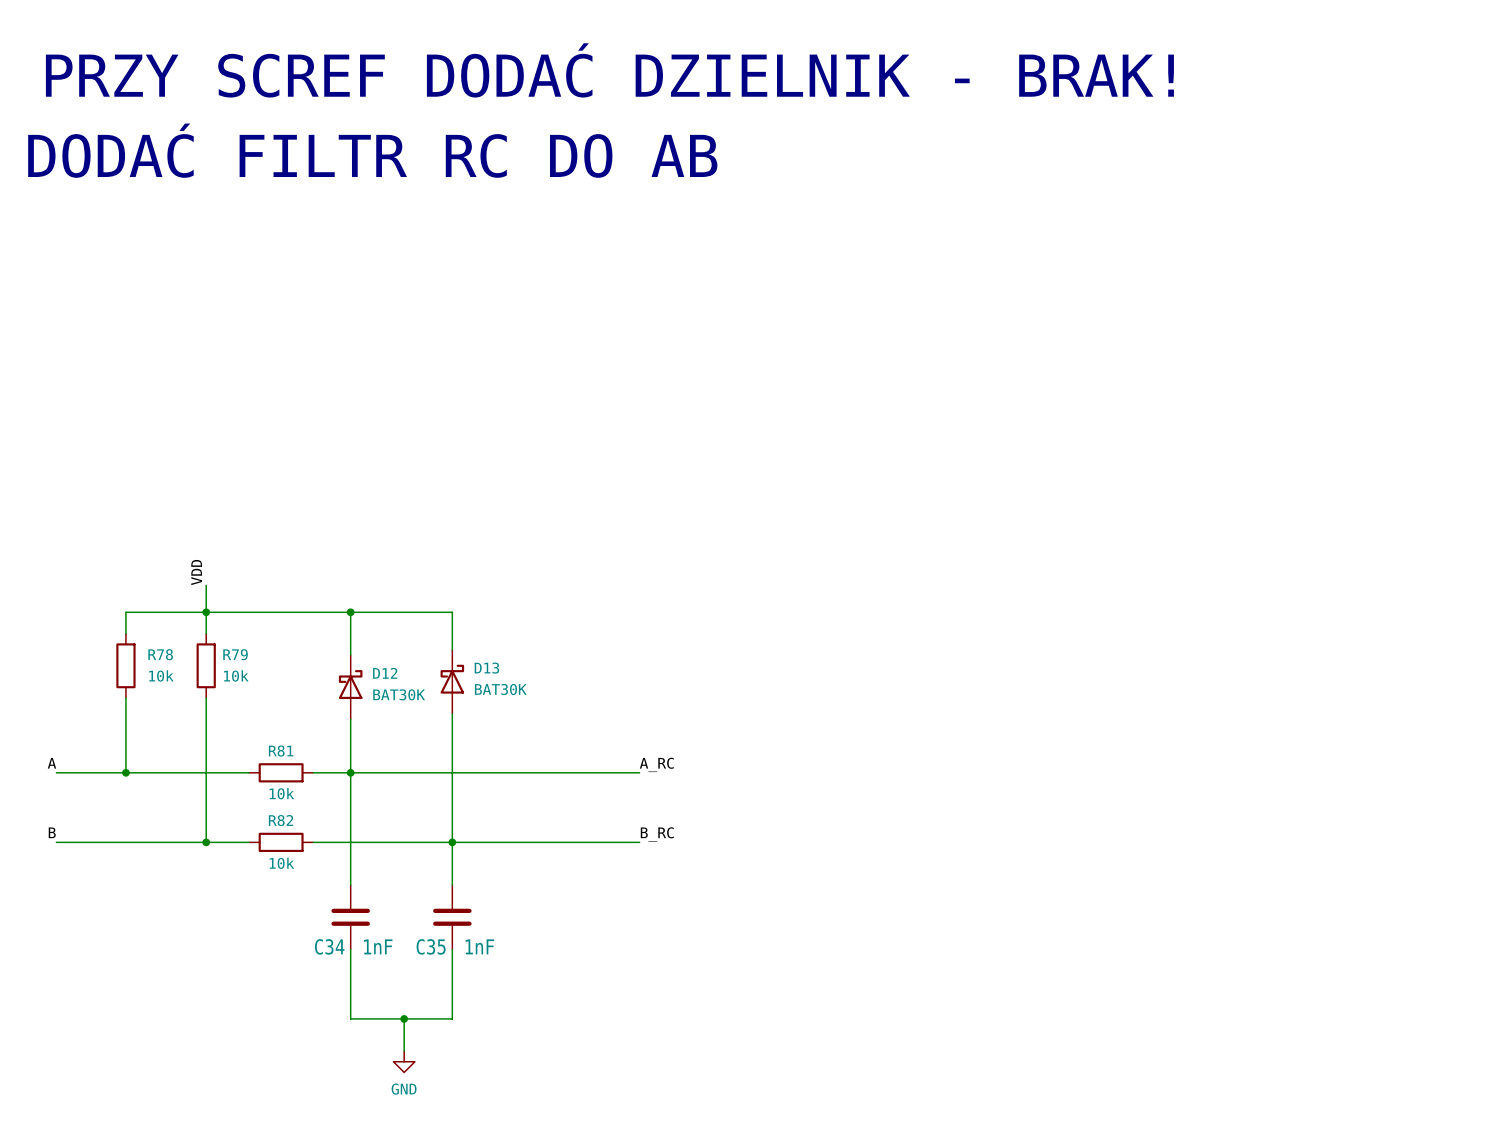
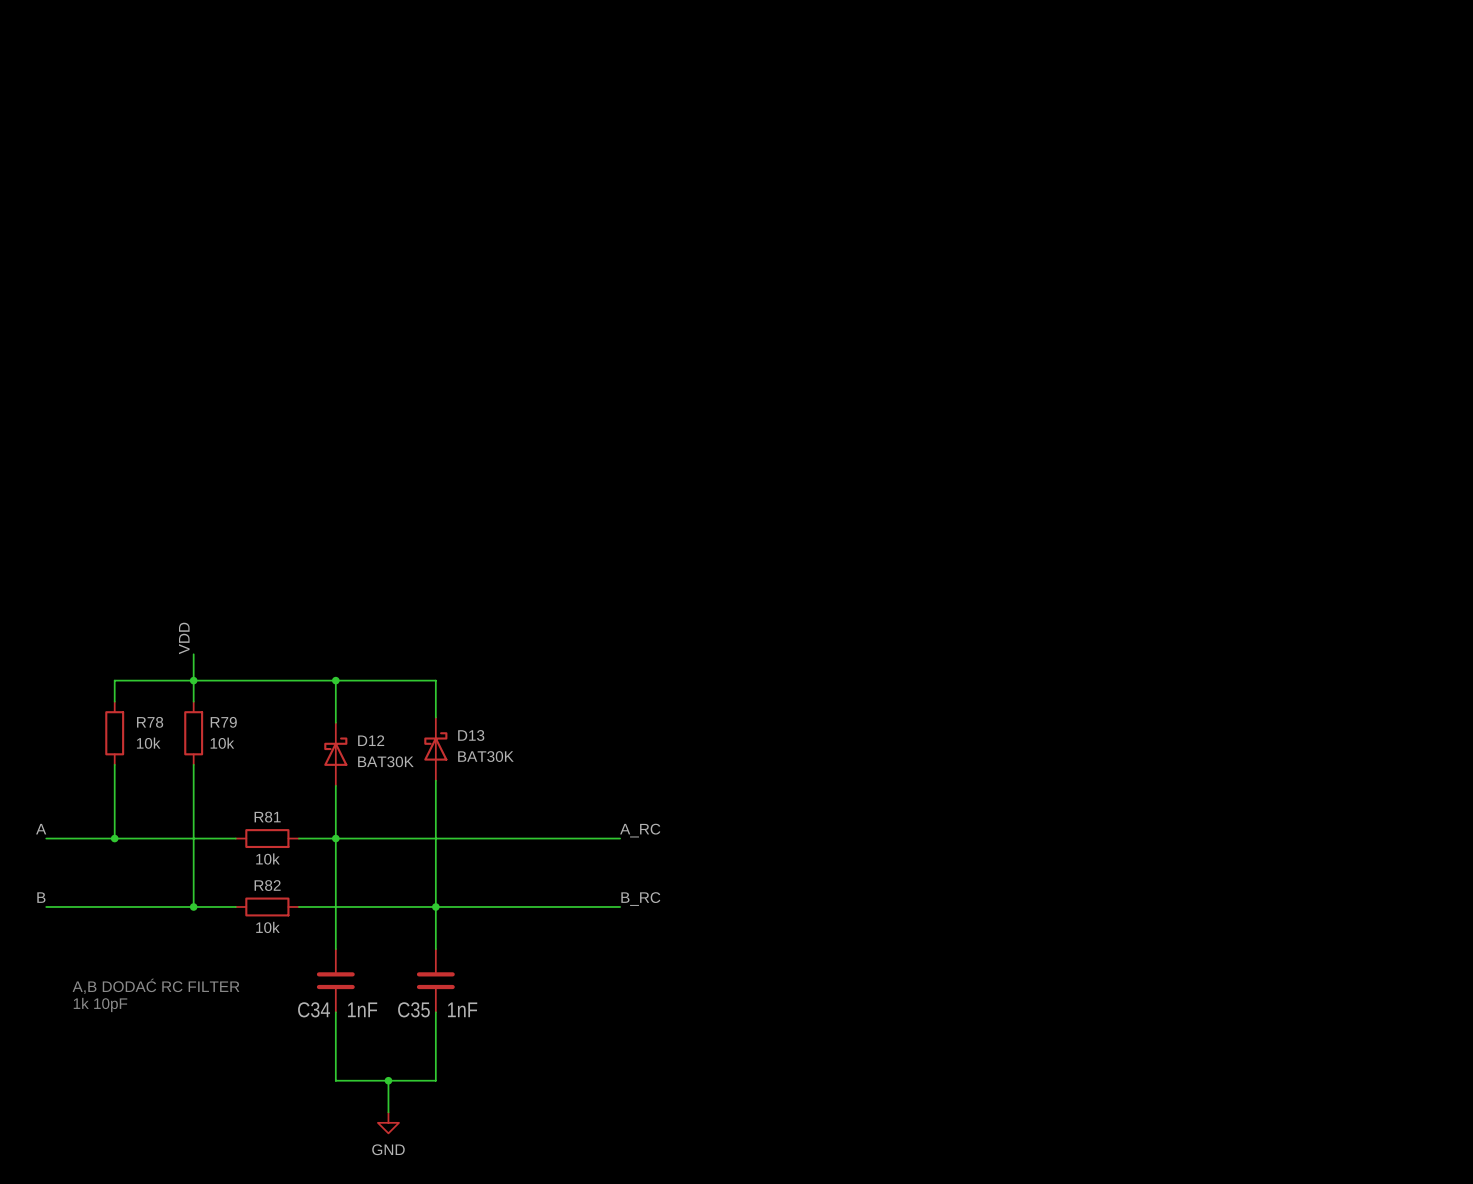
text: PRZY SCREF DODAĆ DZIELNIK - BRAK! (609, 70) -> none
text: DODAĆ FILTR RC DO AB (372, 150) -> none
text: none -> A,B DODAĆ RC FILTER (156, 986)
text: none -> 1k 10pF (100, 1004)

